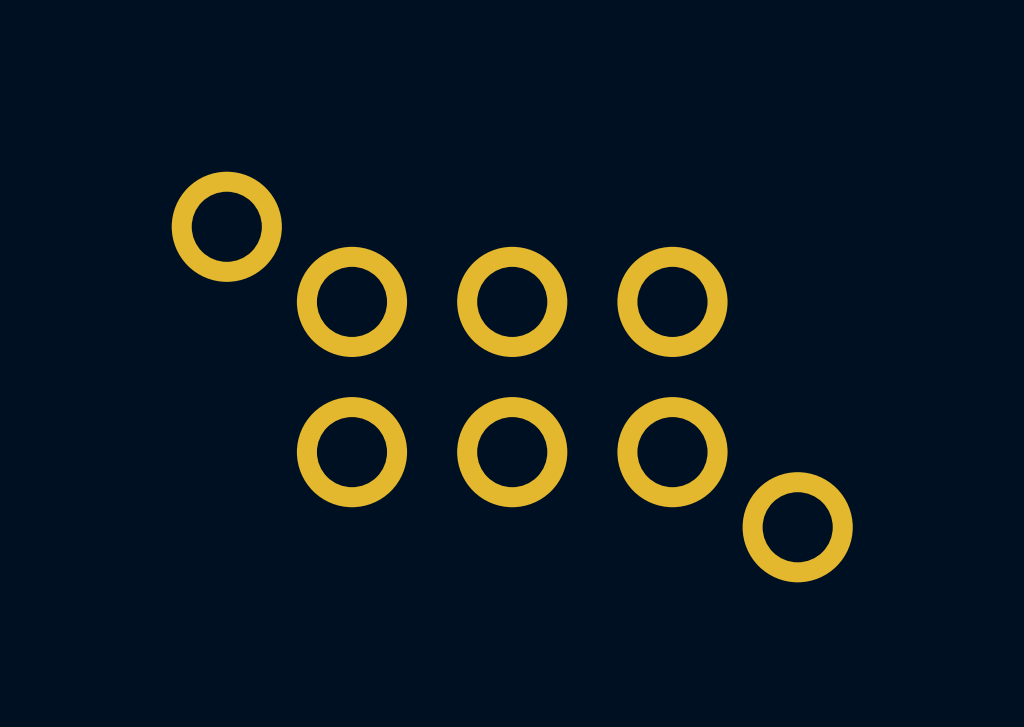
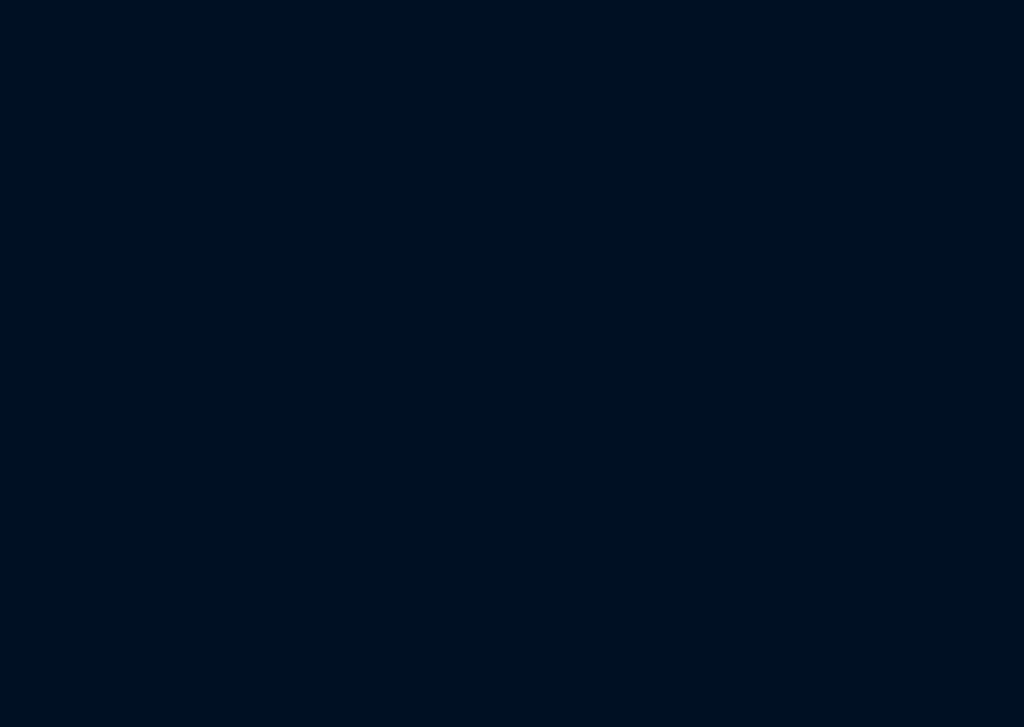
part: (512, 377) -> none

